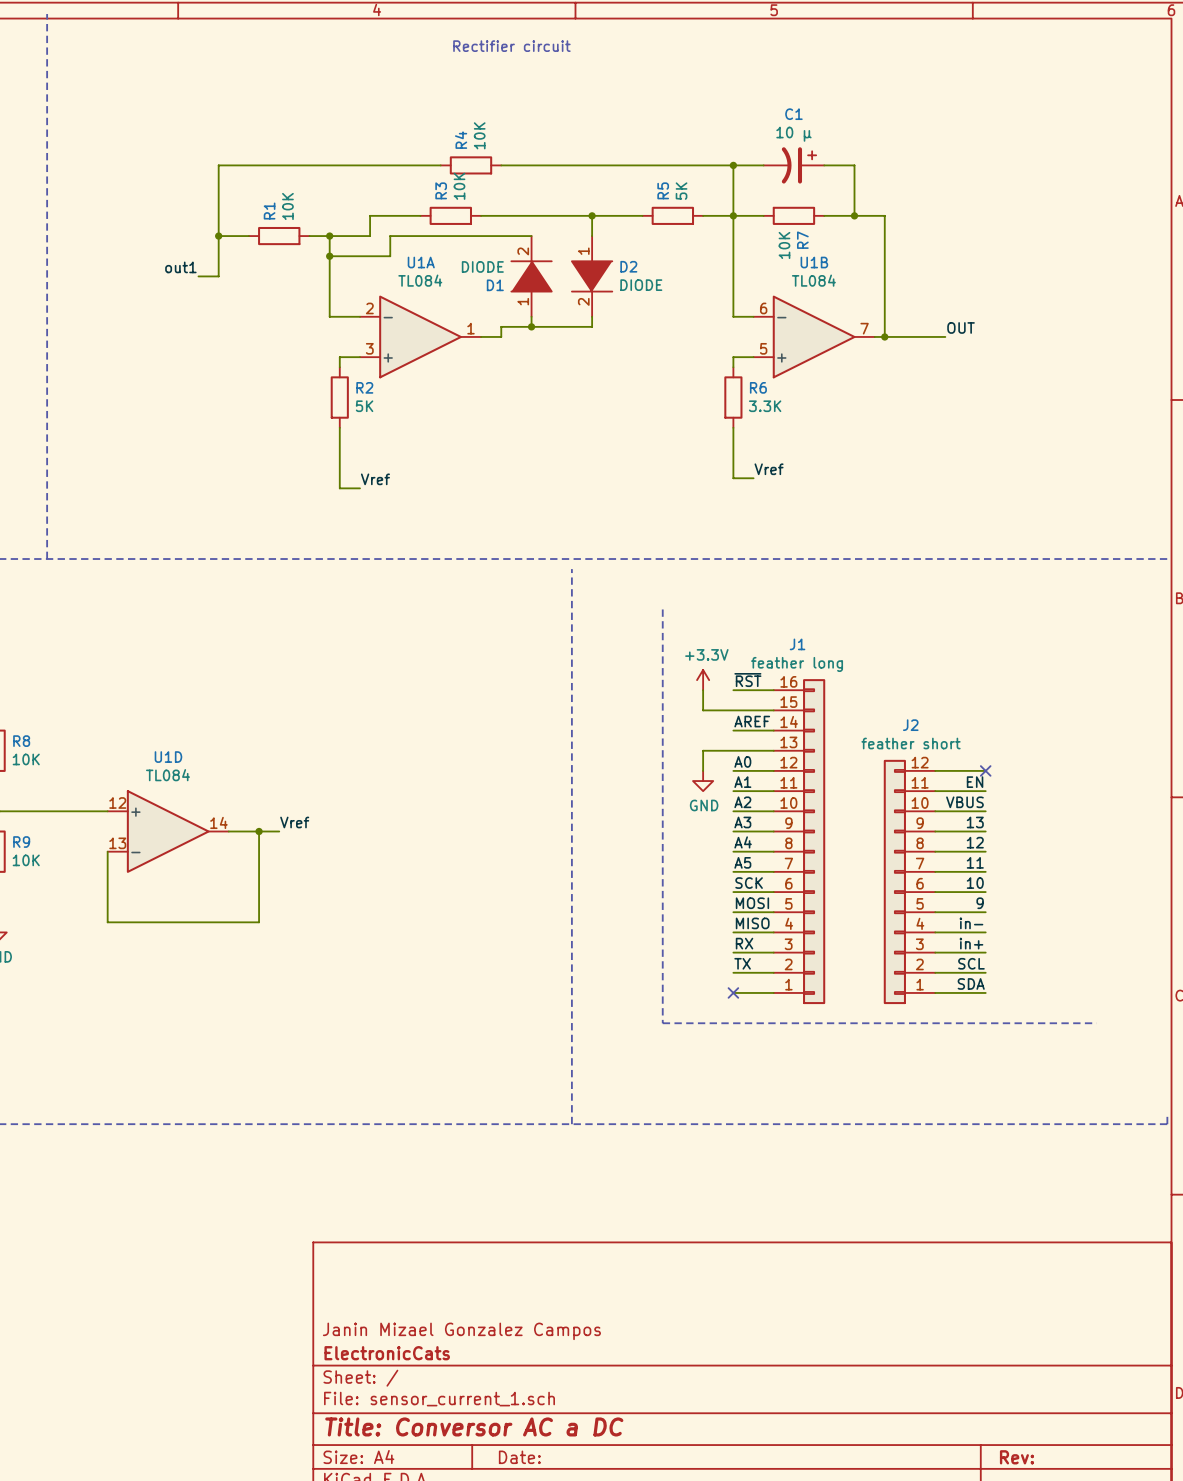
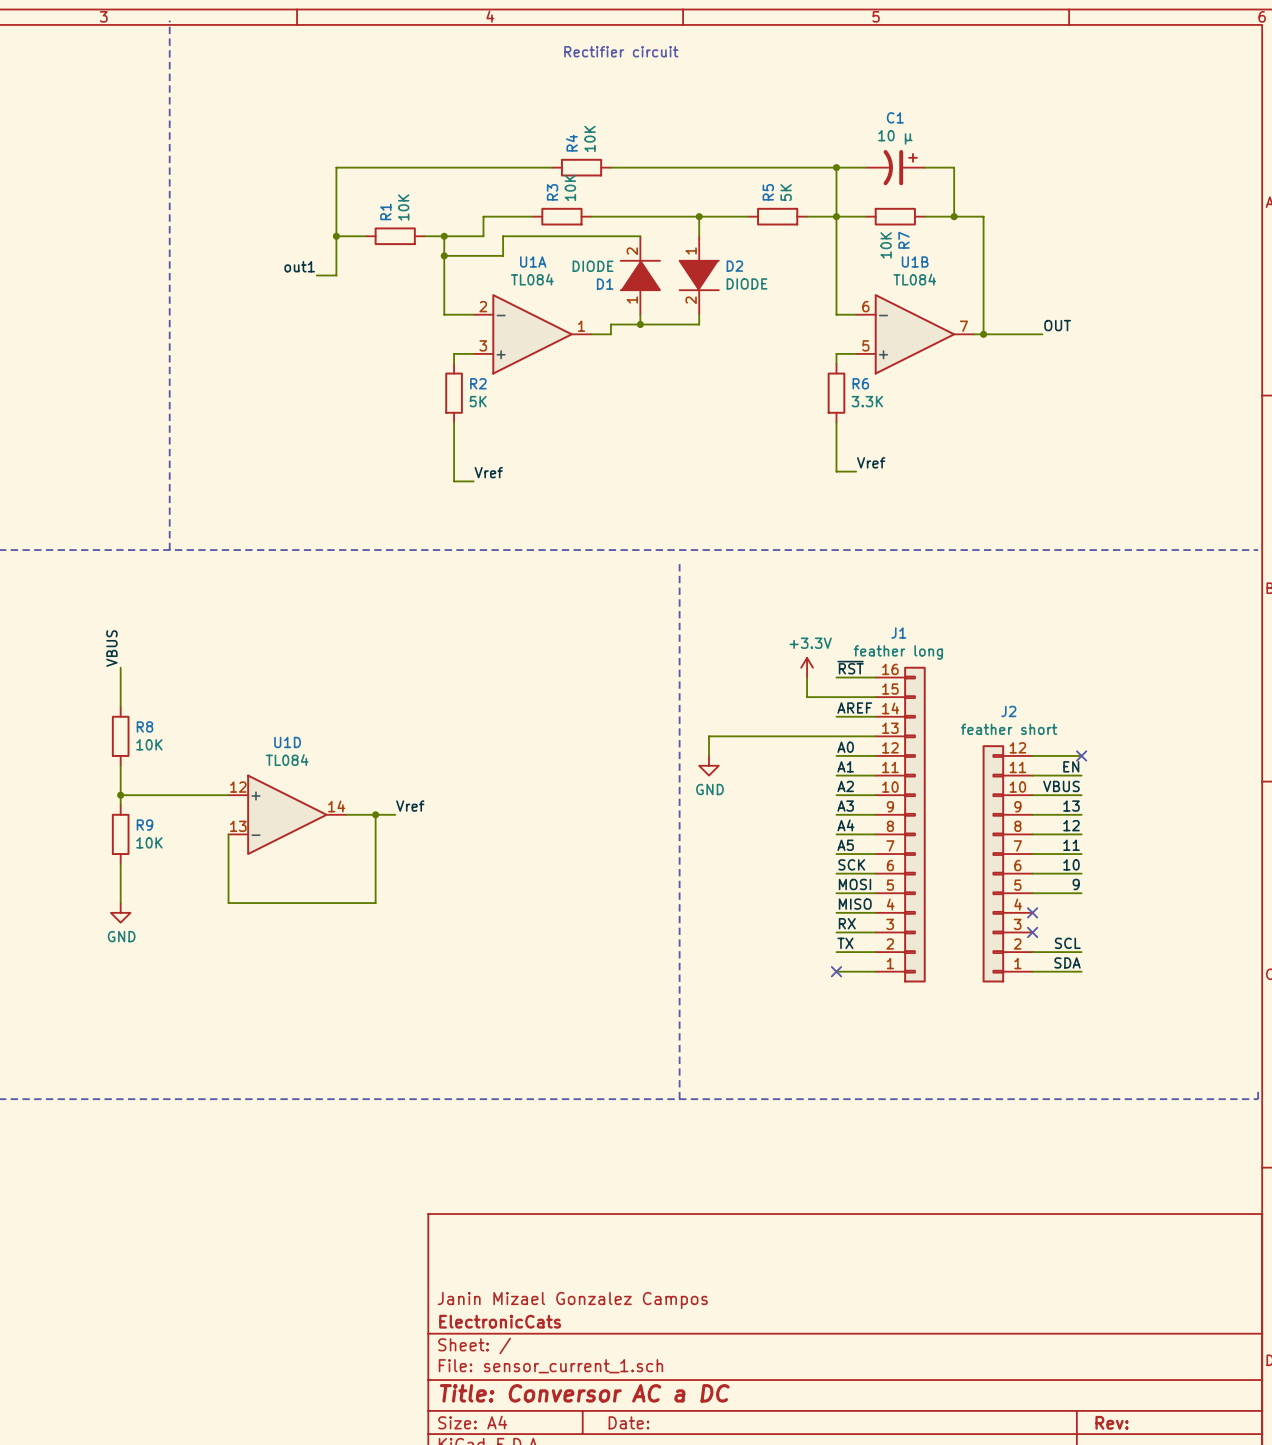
line: (662, 609) (662, 1023) (1096, 1023) -> none
wire: (703, 750) (703, 770) -> (807, 736) (709, 736) (709, 755)
power symbol position: GND (703, 781) -> GND (709, 765)
label: in- (971, 923) -> none
wire: (935, 932) (985, 932) -> none
no-connect mark: none -> (1032, 912)
label: in+ (971, 943) -> none
wire: (935, 952) (985, 952) -> none
no-connect mark: none -> (1032, 932)

